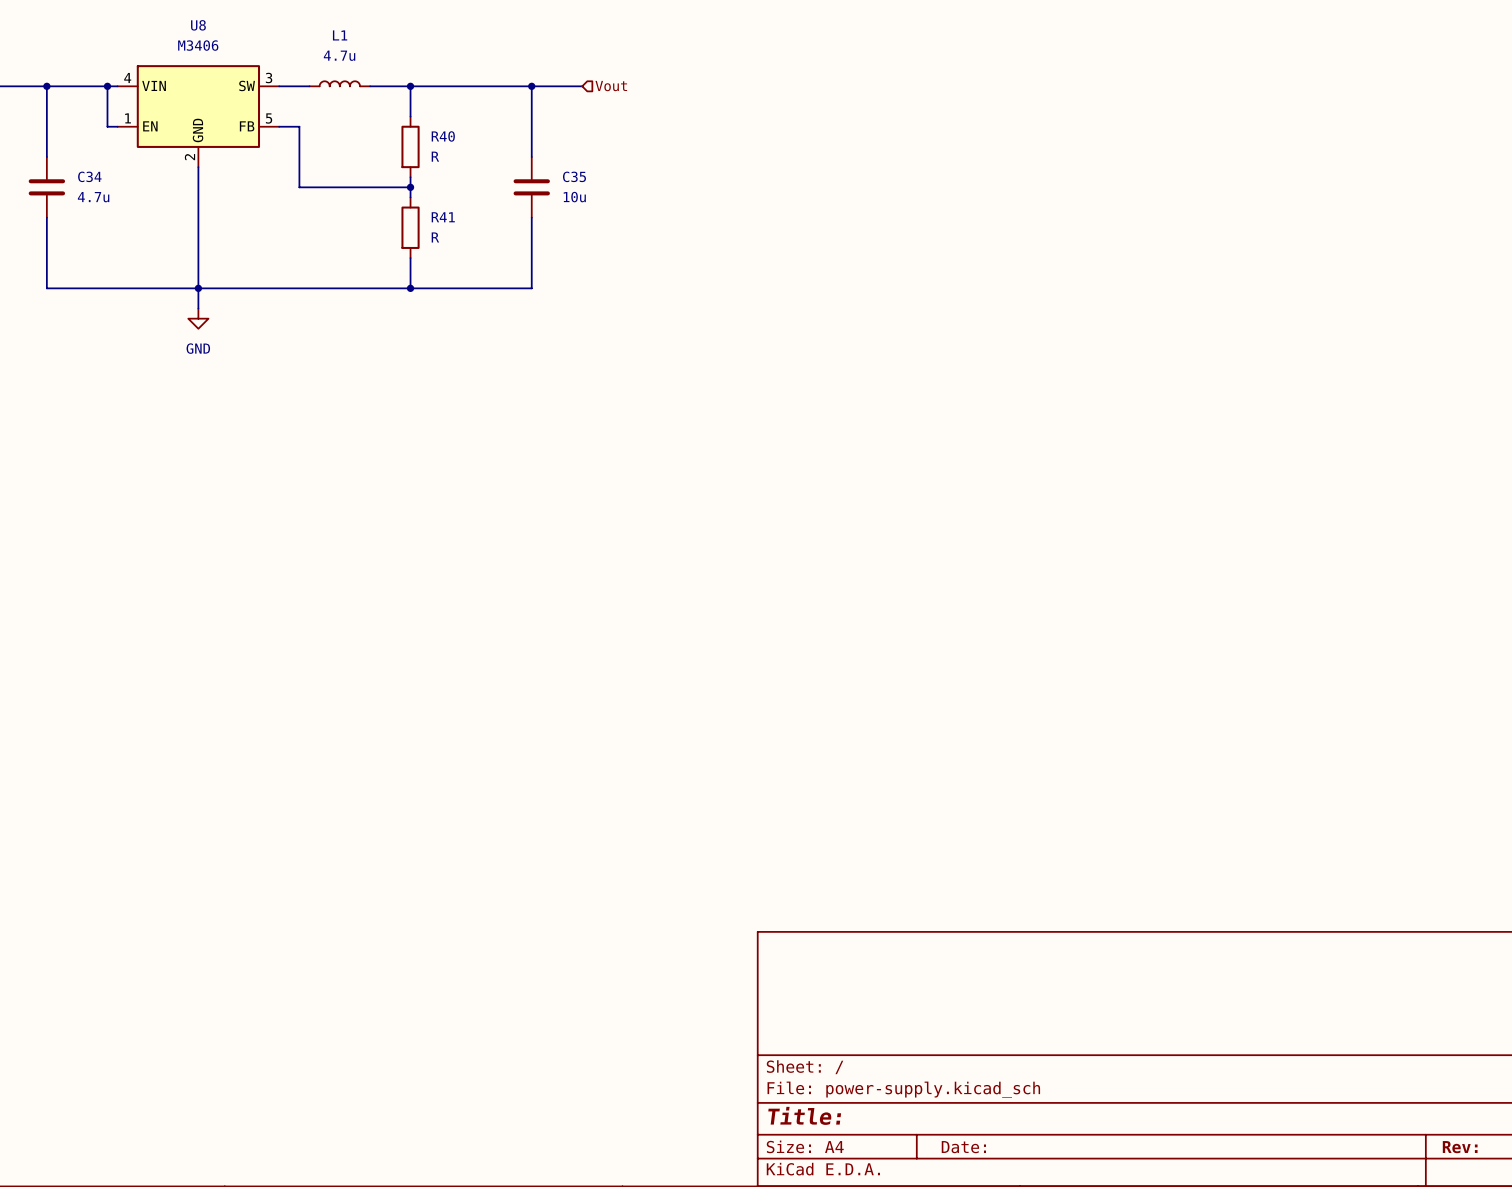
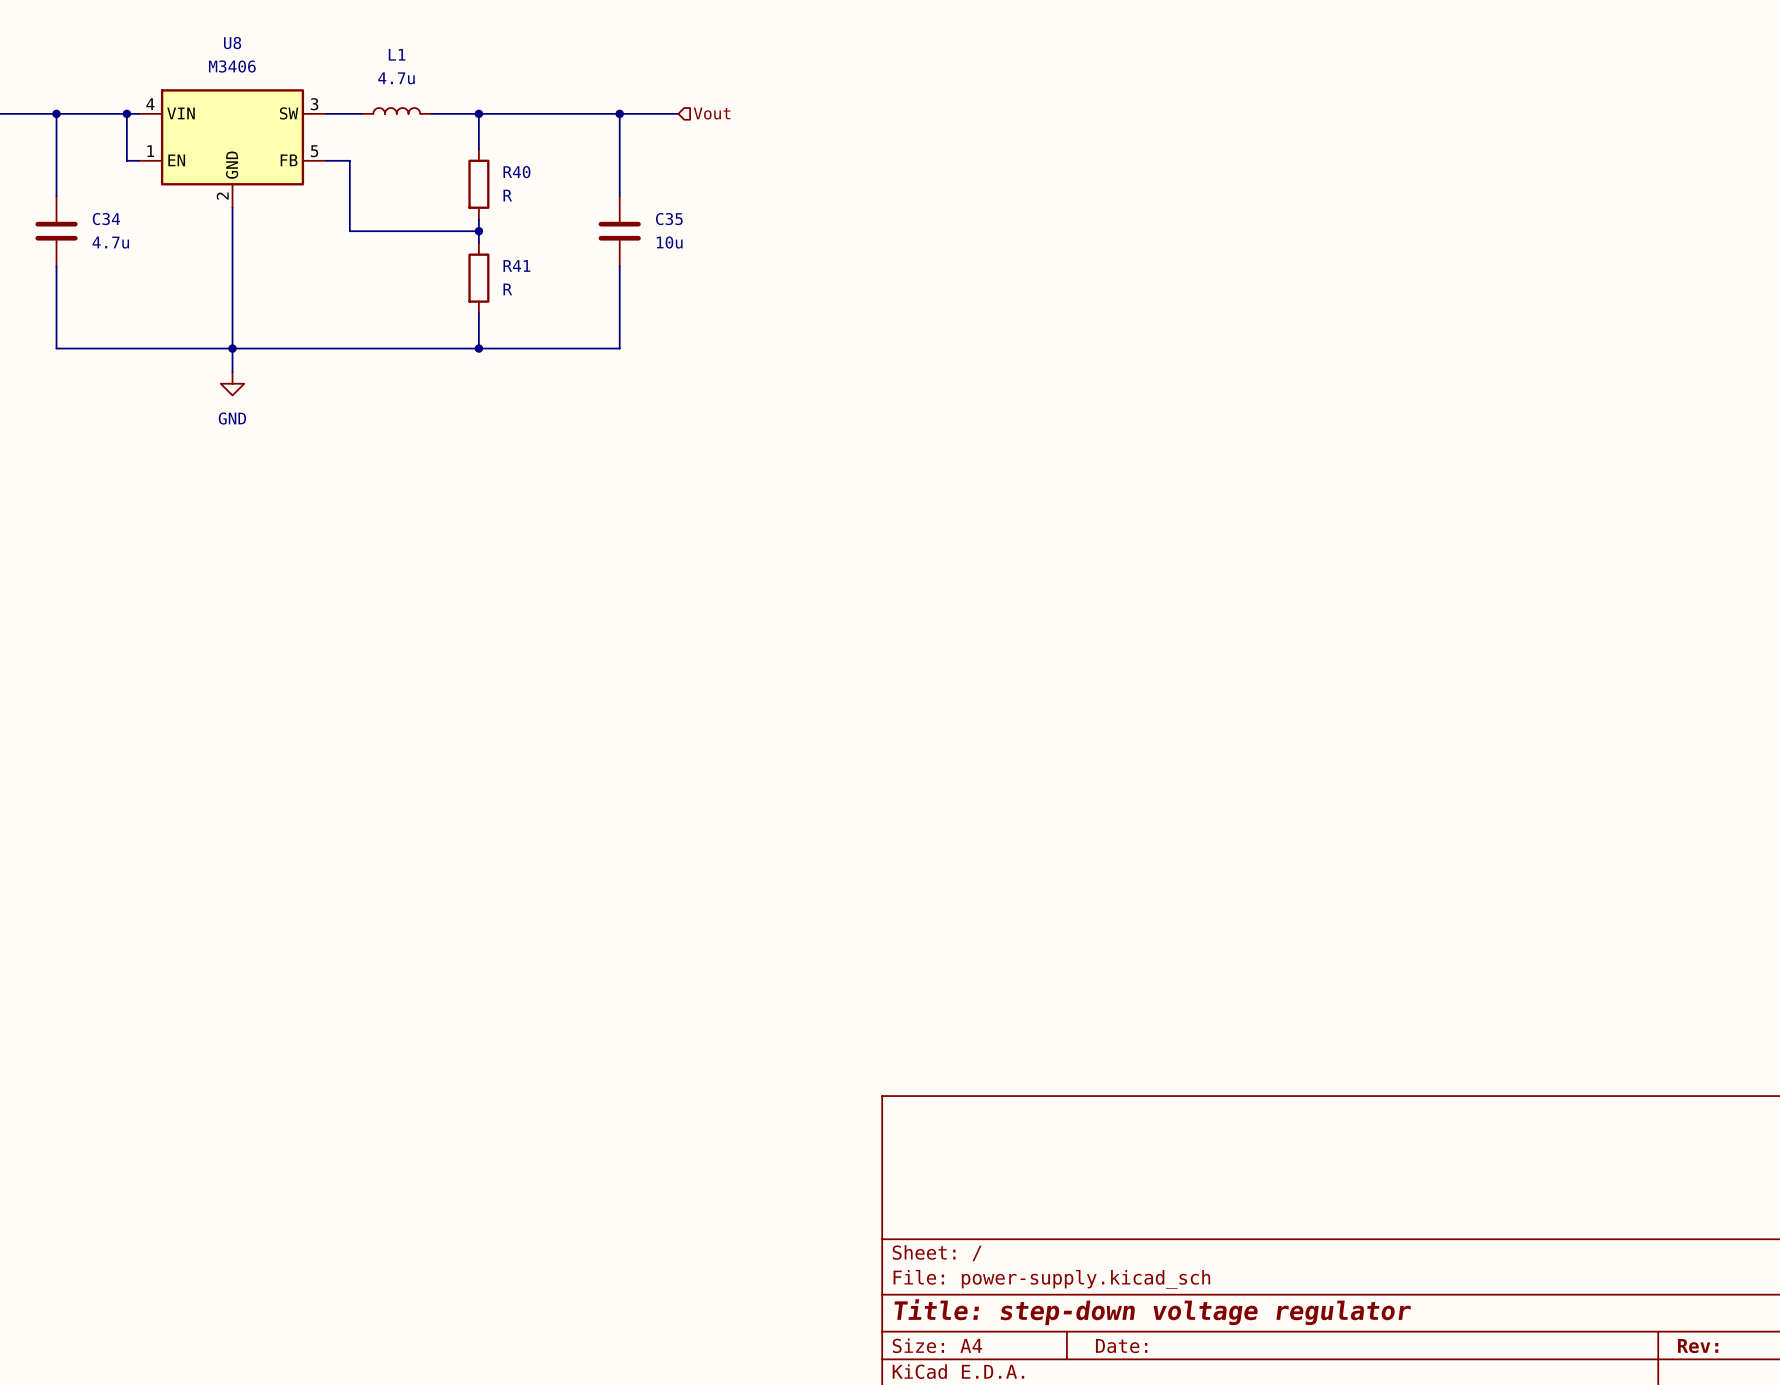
title block: Title: (804, 1115) -> Title: step-down voltage regulator (1152, 1312)

